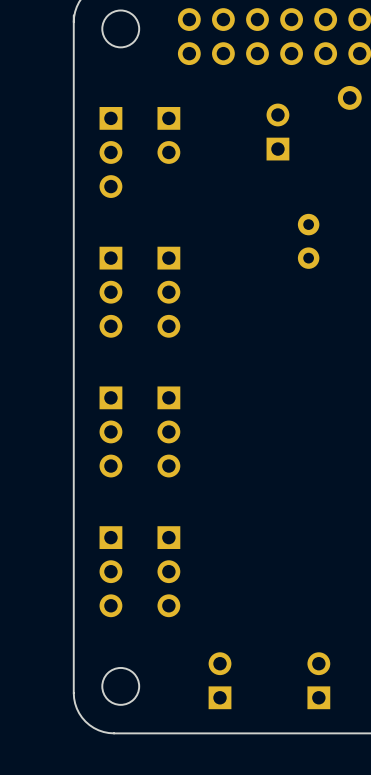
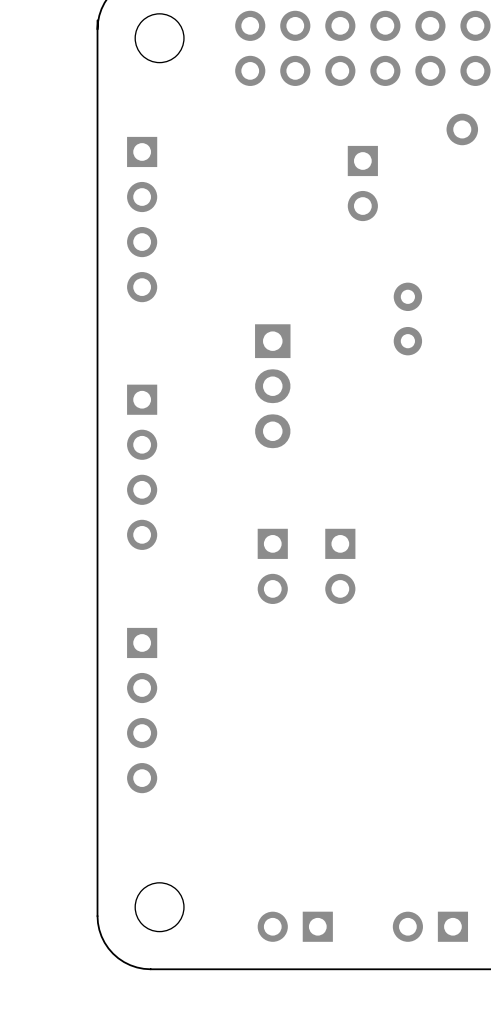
part rotation: 0° (277, 132) -> 180° (362, 183)
part: (168, 135) -> none
part: (110, 152) -> none
part: none -> (142, 219)
part: (110, 292) -> none
part: (168, 292) -> none
part: none -> (272, 386)
part: none -> (142, 467)
part: none -> (272, 566)
part: none -> (340, 566)
part: (110, 431) -> none
part: (168, 431) -> none
part: none -> (142, 710)
part: (110, 571) -> none
part: (168, 571) -> none
part rotation: 0° (220, 680) -> 90° counterclockwise (295, 926)
part rotation: 0° (318, 680) -> 90° counterclockwise (430, 926)

